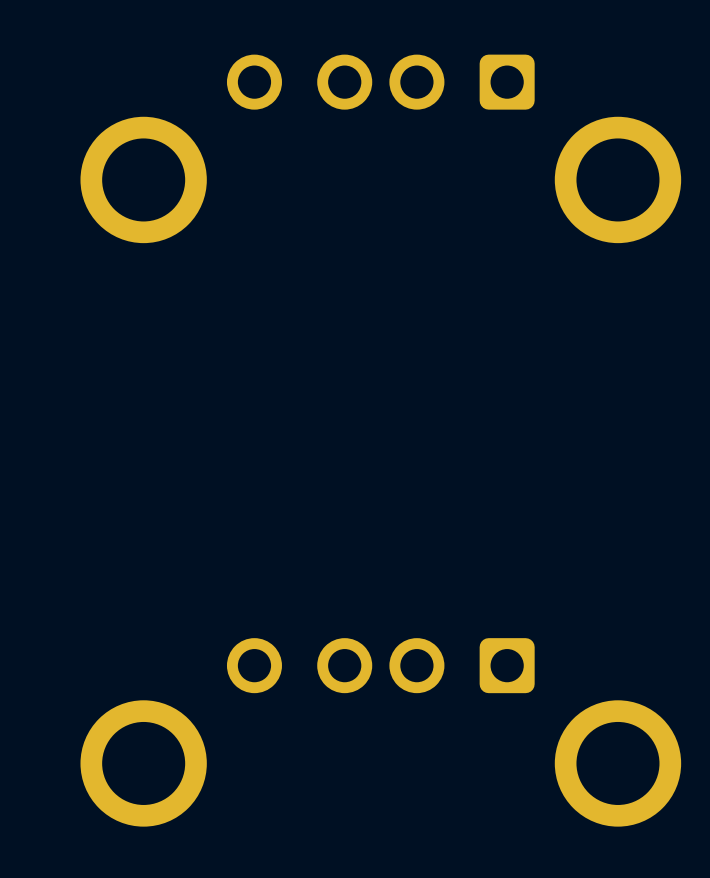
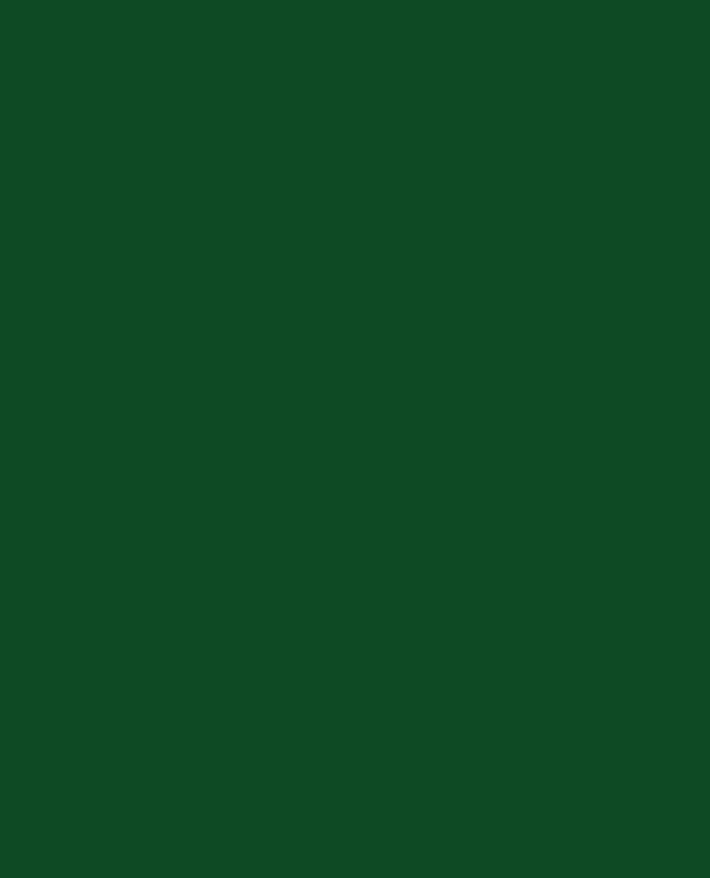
part: (380, 148) -> none
part: (380, 732) -> none

